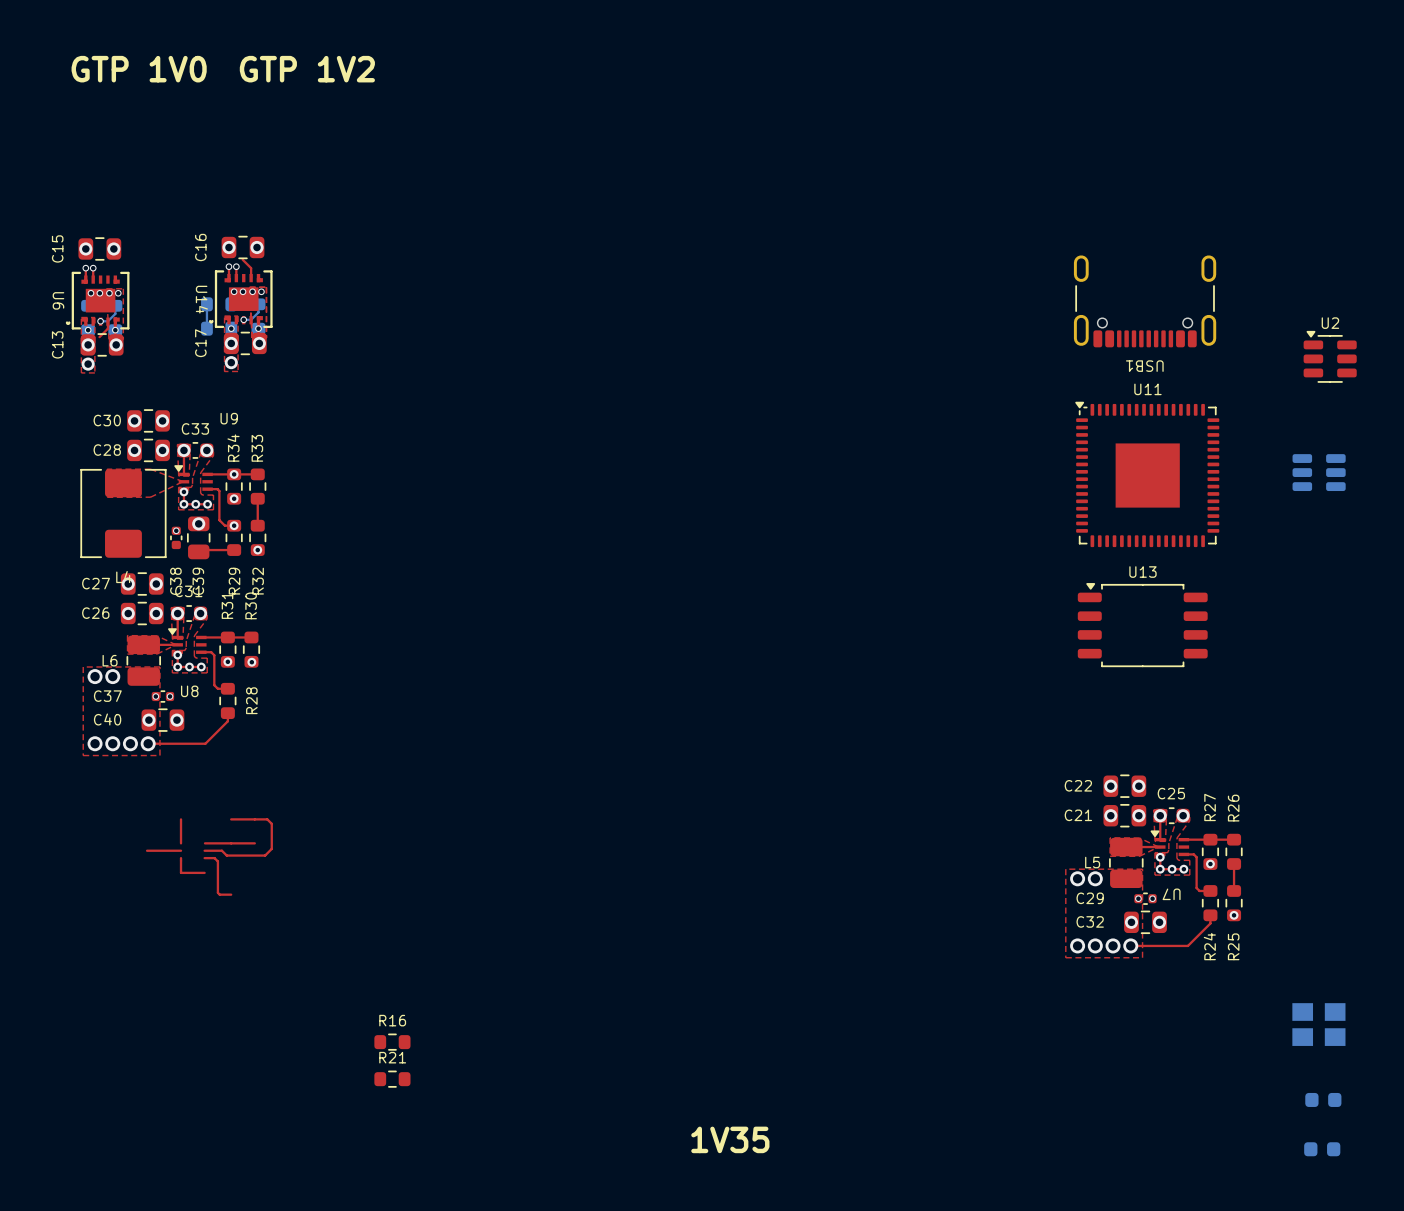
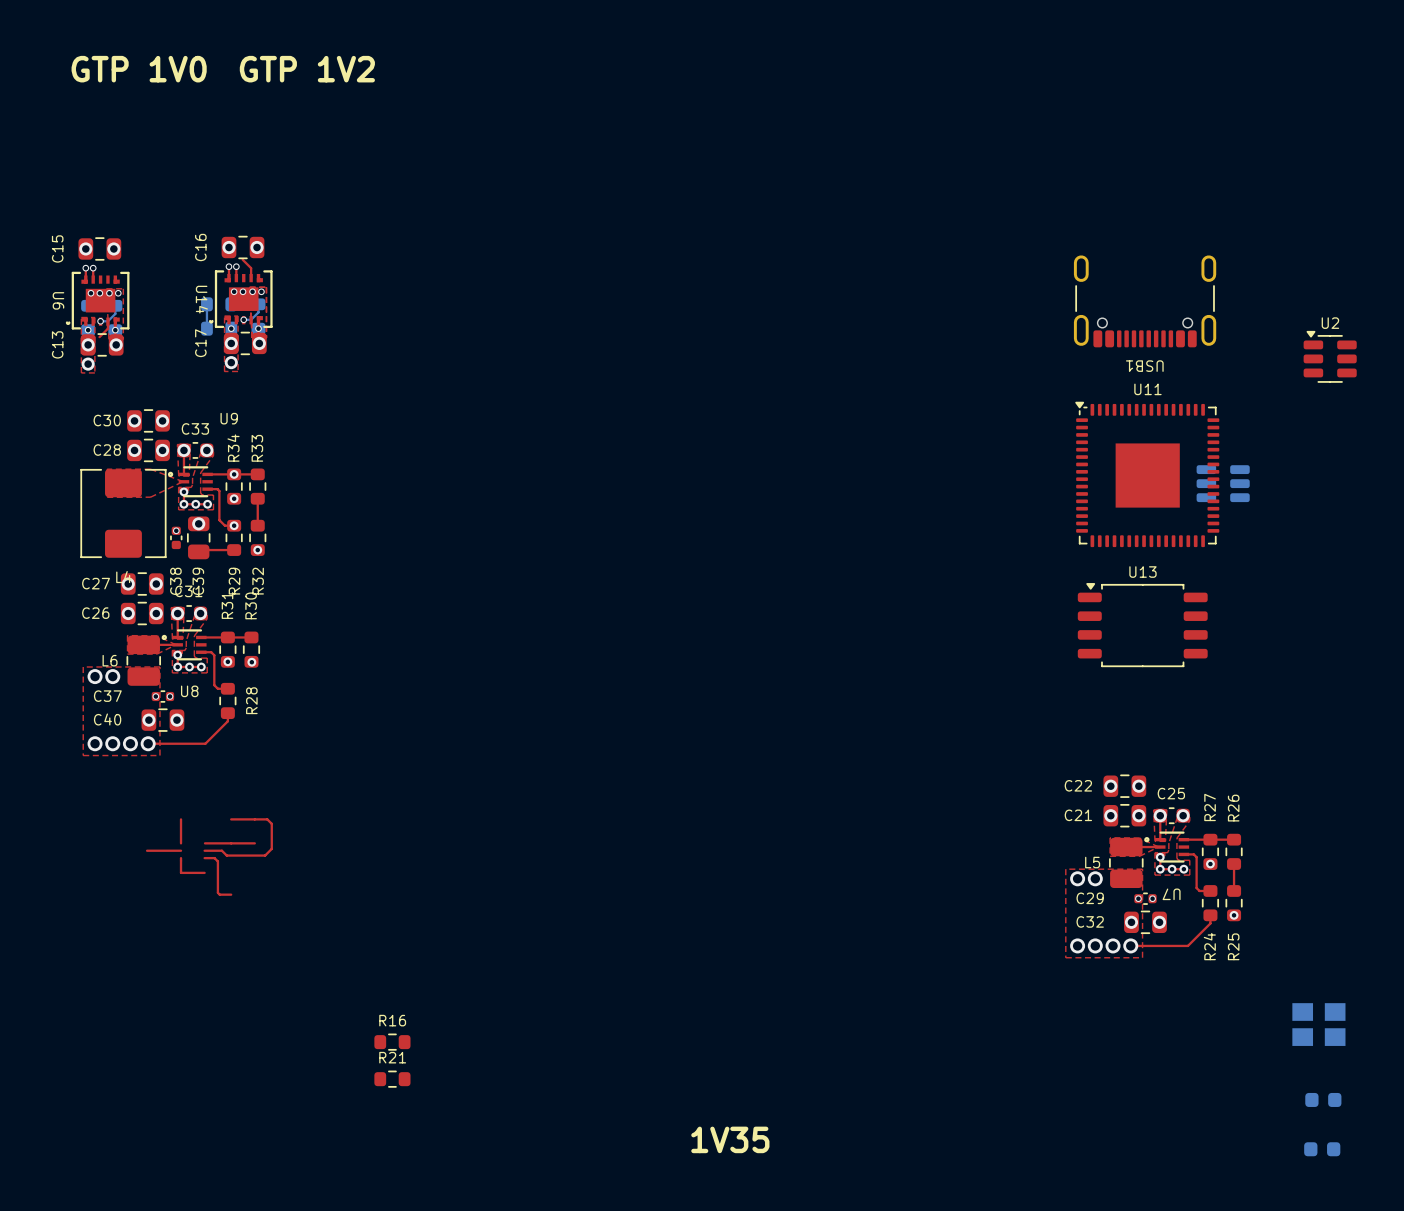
U9 footprint: [174, 465, 213, 491] -> [167, 466, 213, 498]
part position: (1319, 472) -> (1223, 483)
U8 footprint: [168, 628, 207, 654] -> [161, 629, 207, 661]
U7 footprint: [1150, 830, 1190, 857] -> [1144, 831, 1190, 863]

